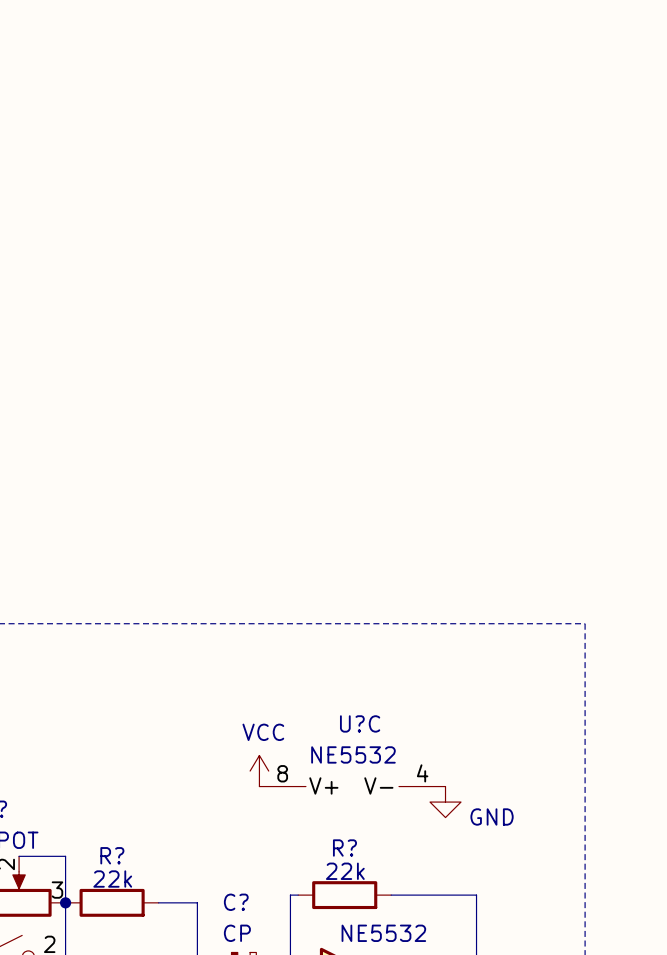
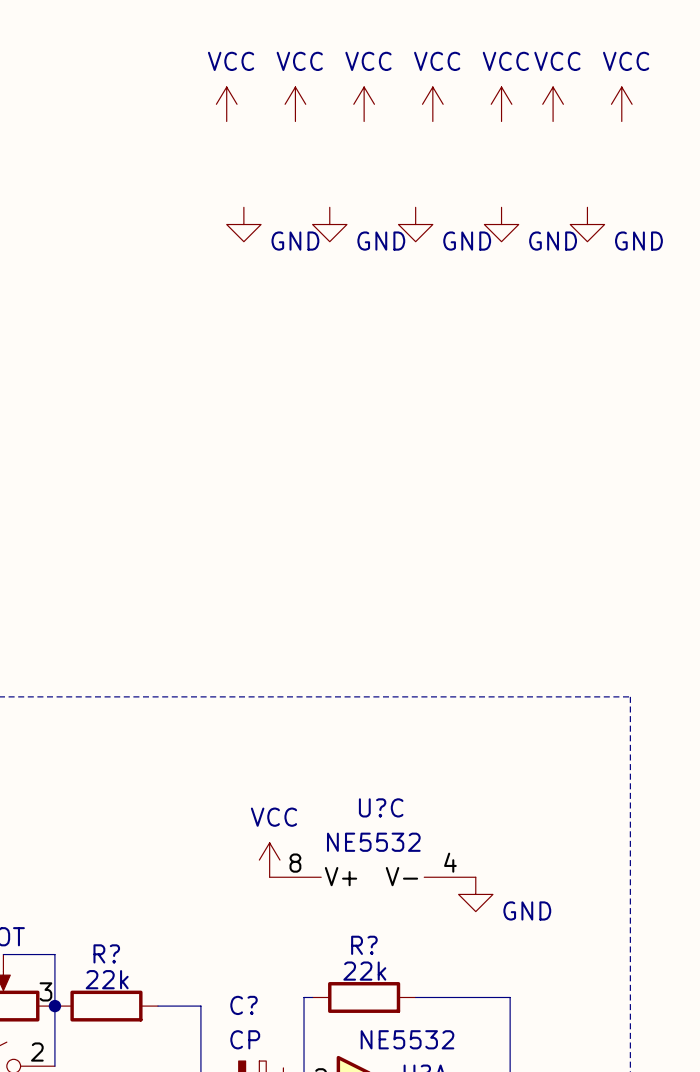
power symbol: none -> VCC (226, 104)
power symbol: none -> VCC (295, 104)
power symbol: none -> VCC (364, 104)
power symbol: none -> VCC (432, 104)
power symbol: none -> VCC (501, 104)
power symbol: none -> VCC (553, 104)
power symbol: none -> VCC (621, 104)
power symbol: none -> GND (243, 224)
power symbol: none -> GND (329, 224)
power symbol: none -> GND (415, 224)
power symbol: none -> GND (501, 224)
power symbol: none -> GND (587, 224)

